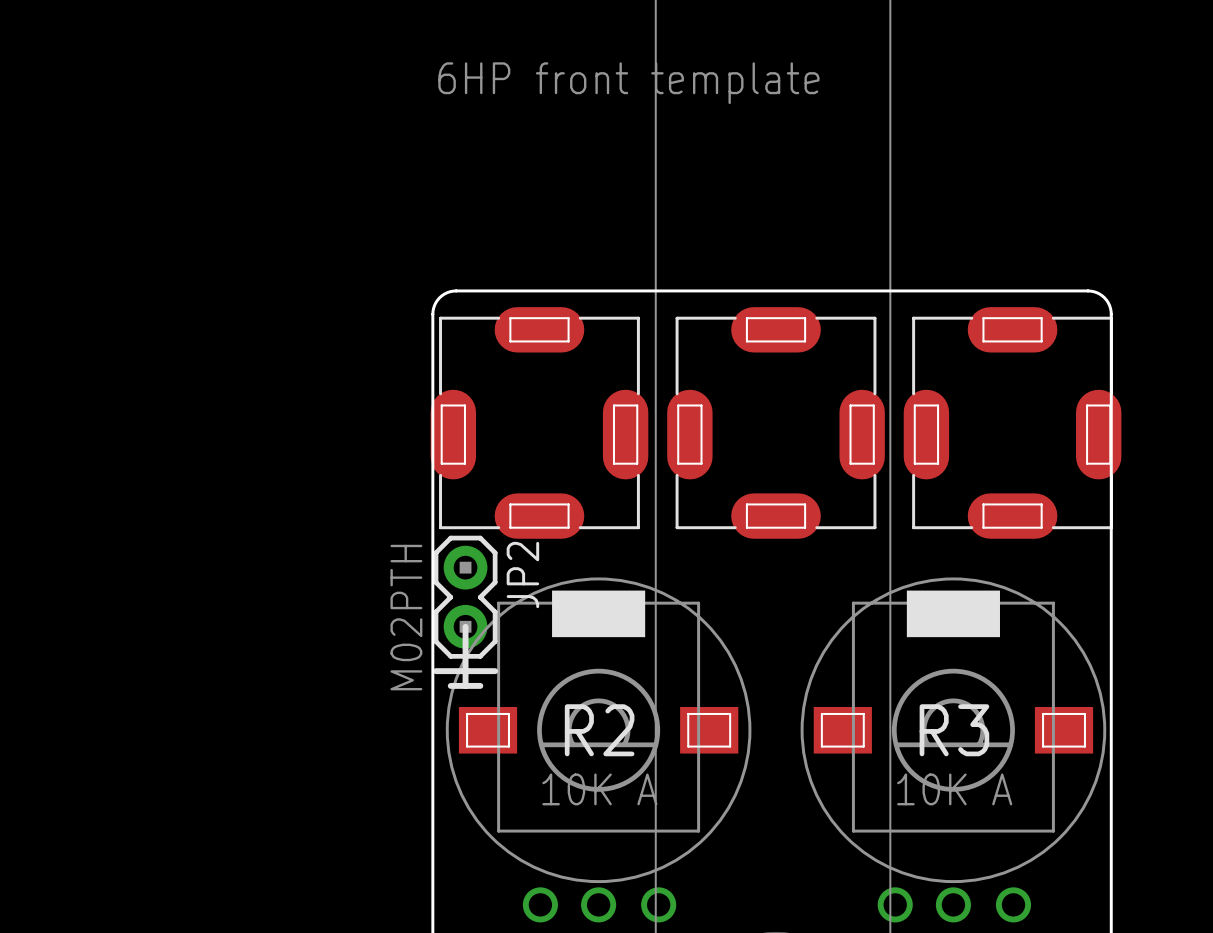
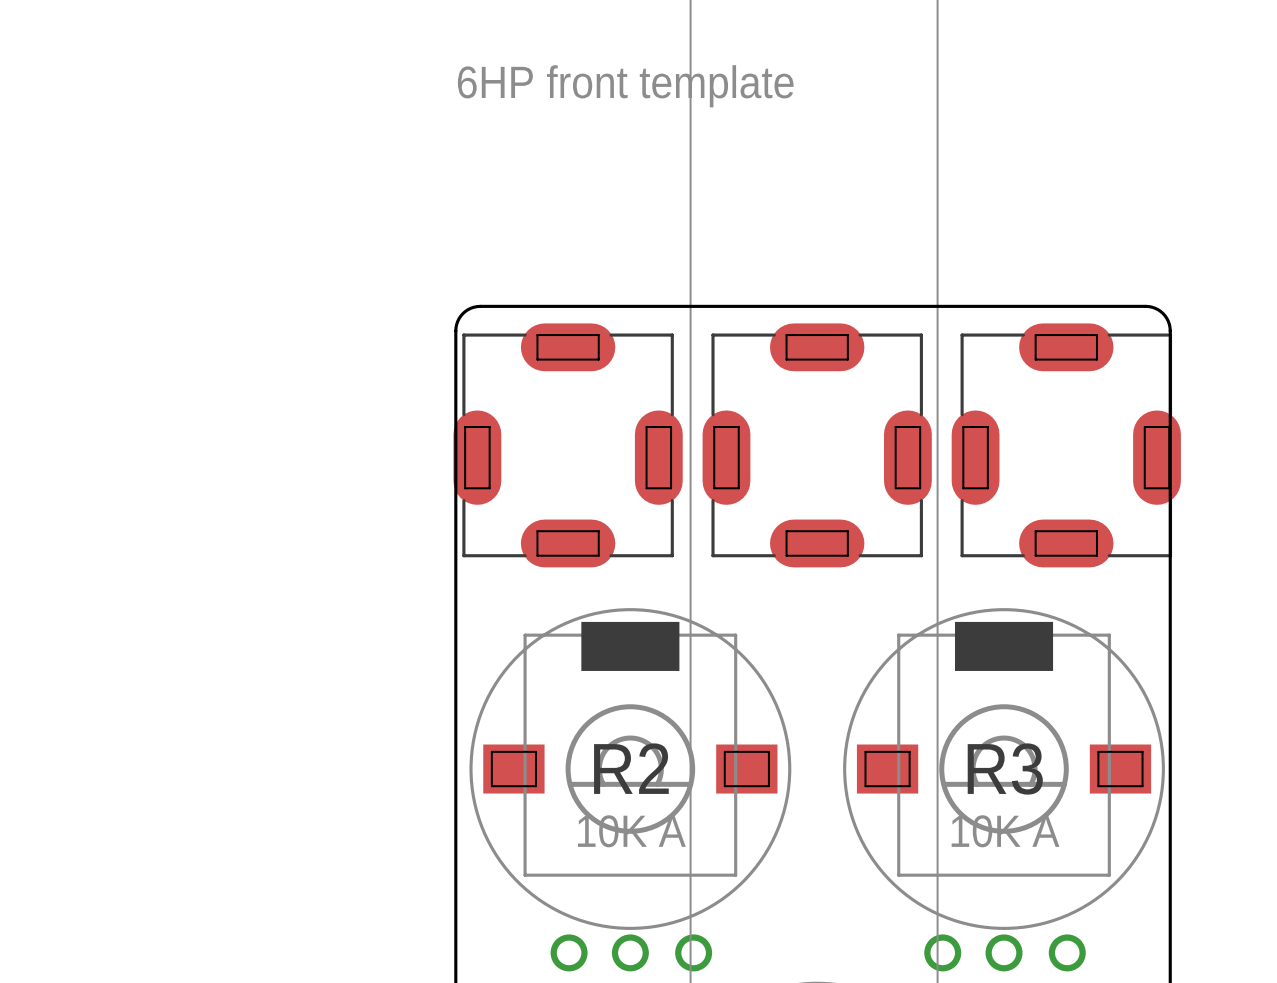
JP2: M02PTH (465, 597) -> none
line: (465, 626) (465, 685) -> none
line: (435, 671) (495, 671) -> none
line: (450, 685) (480, 685) -> none

